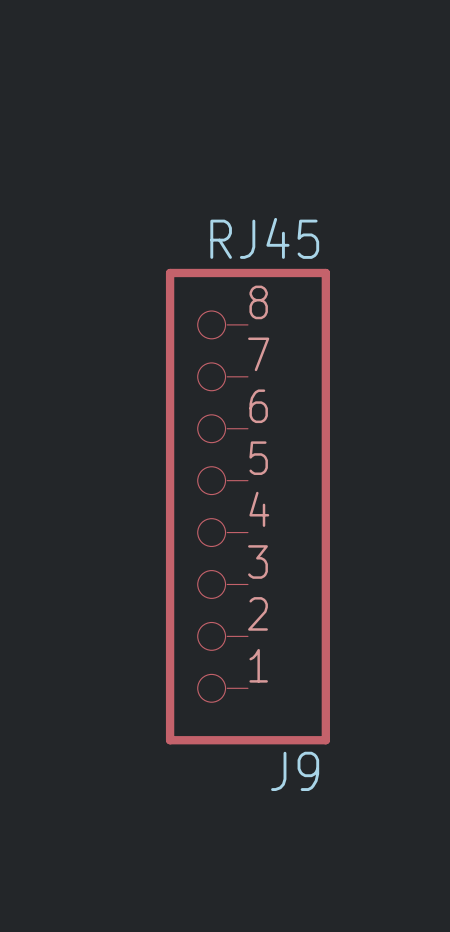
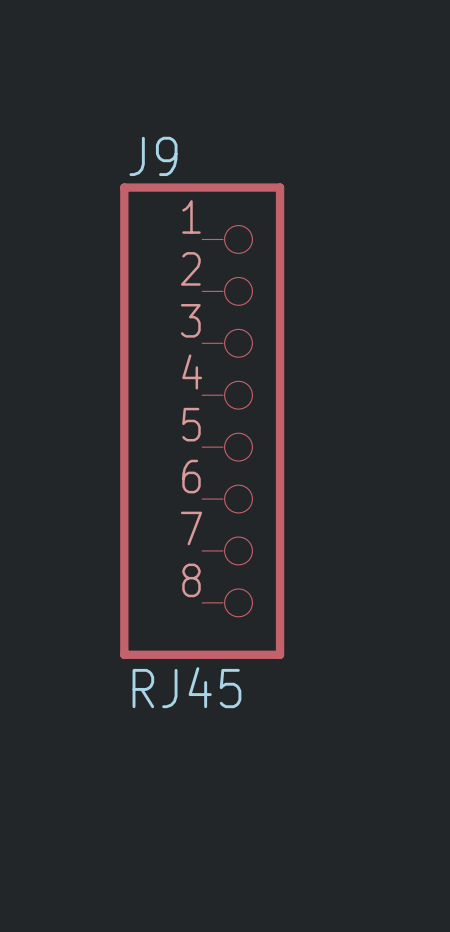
J9 rotation: 0° (247, 506) -> 180° (202, 421)

